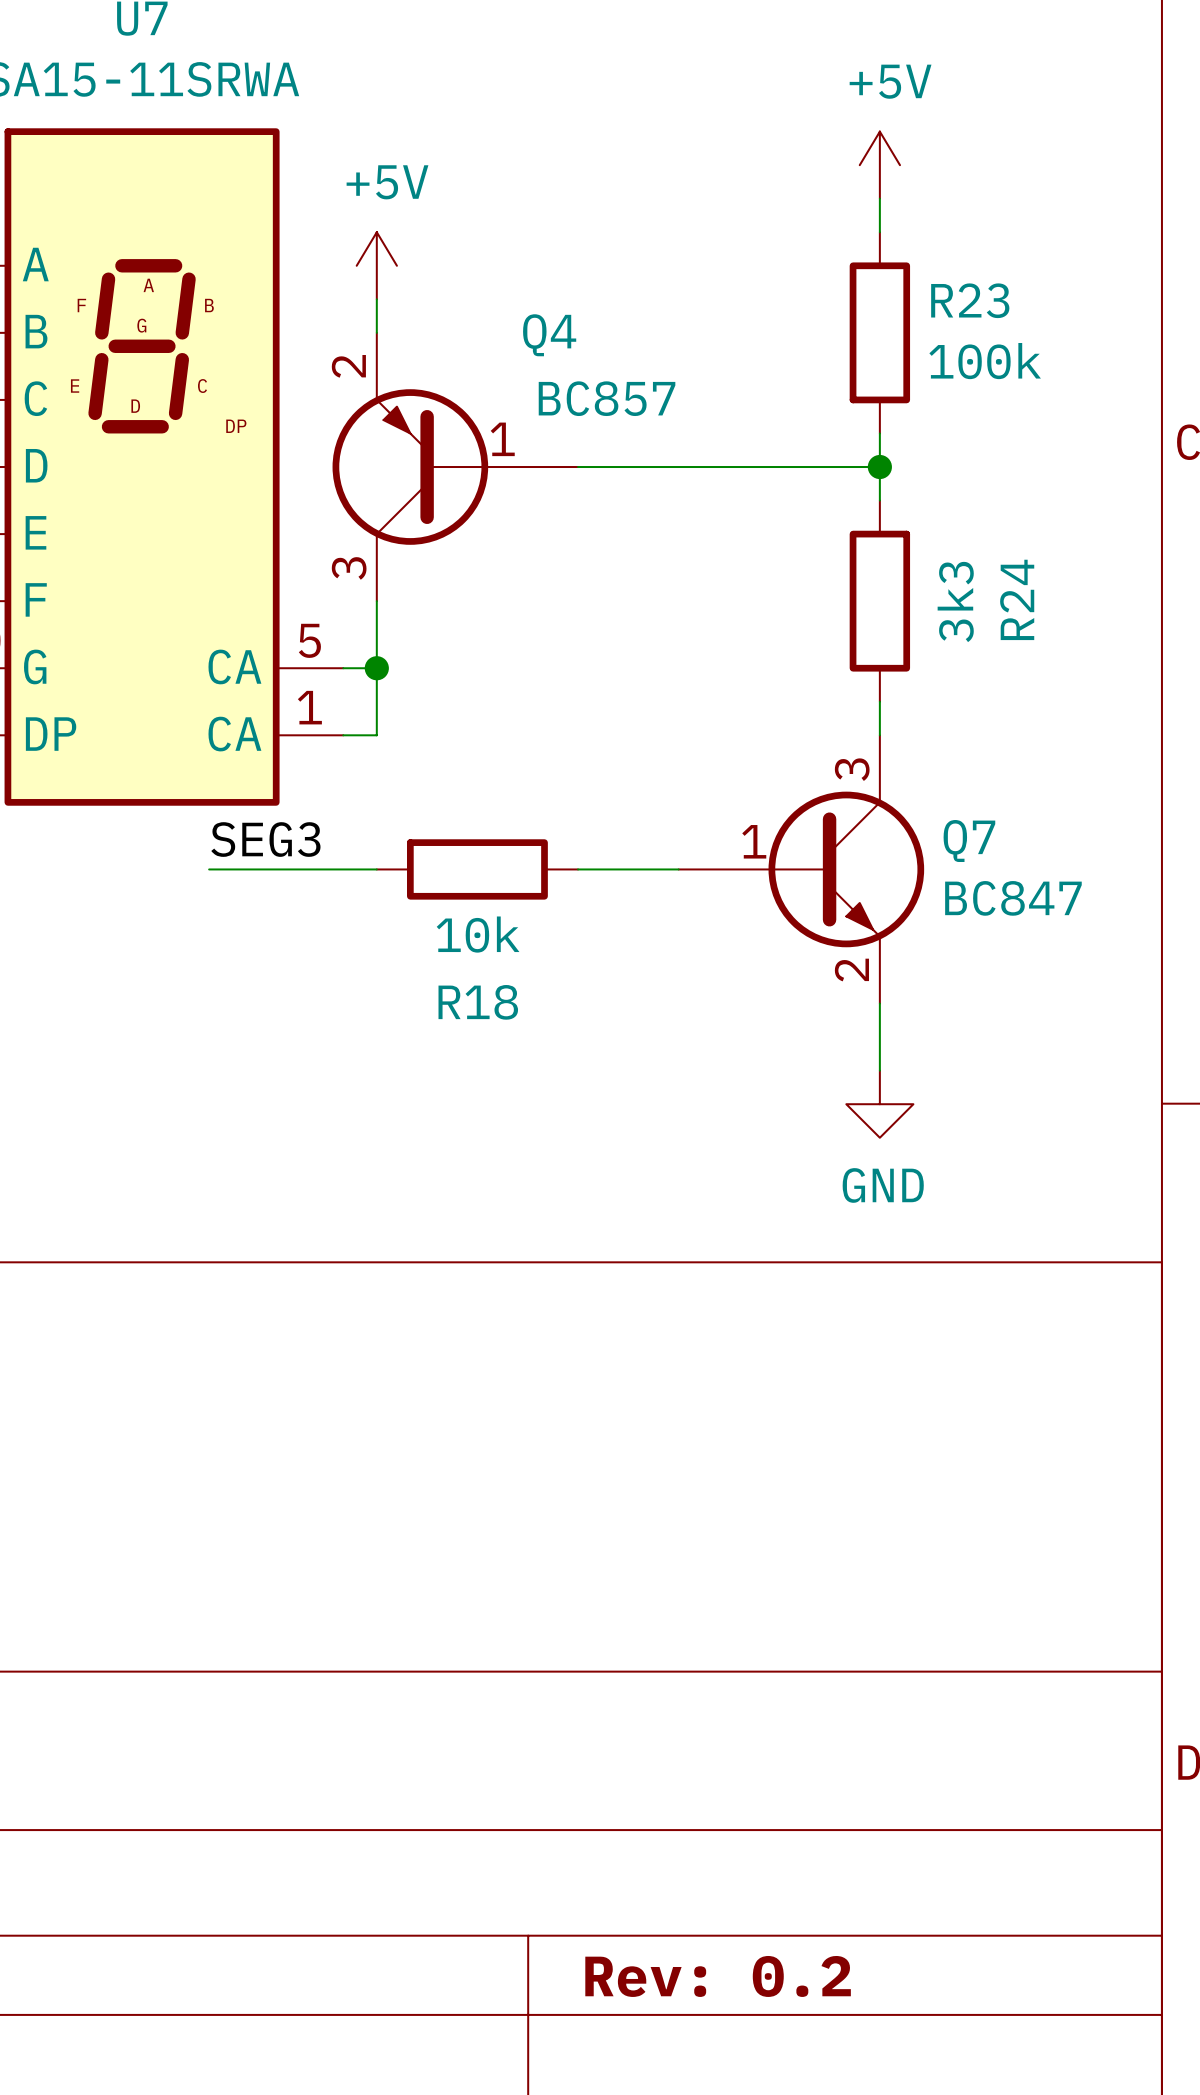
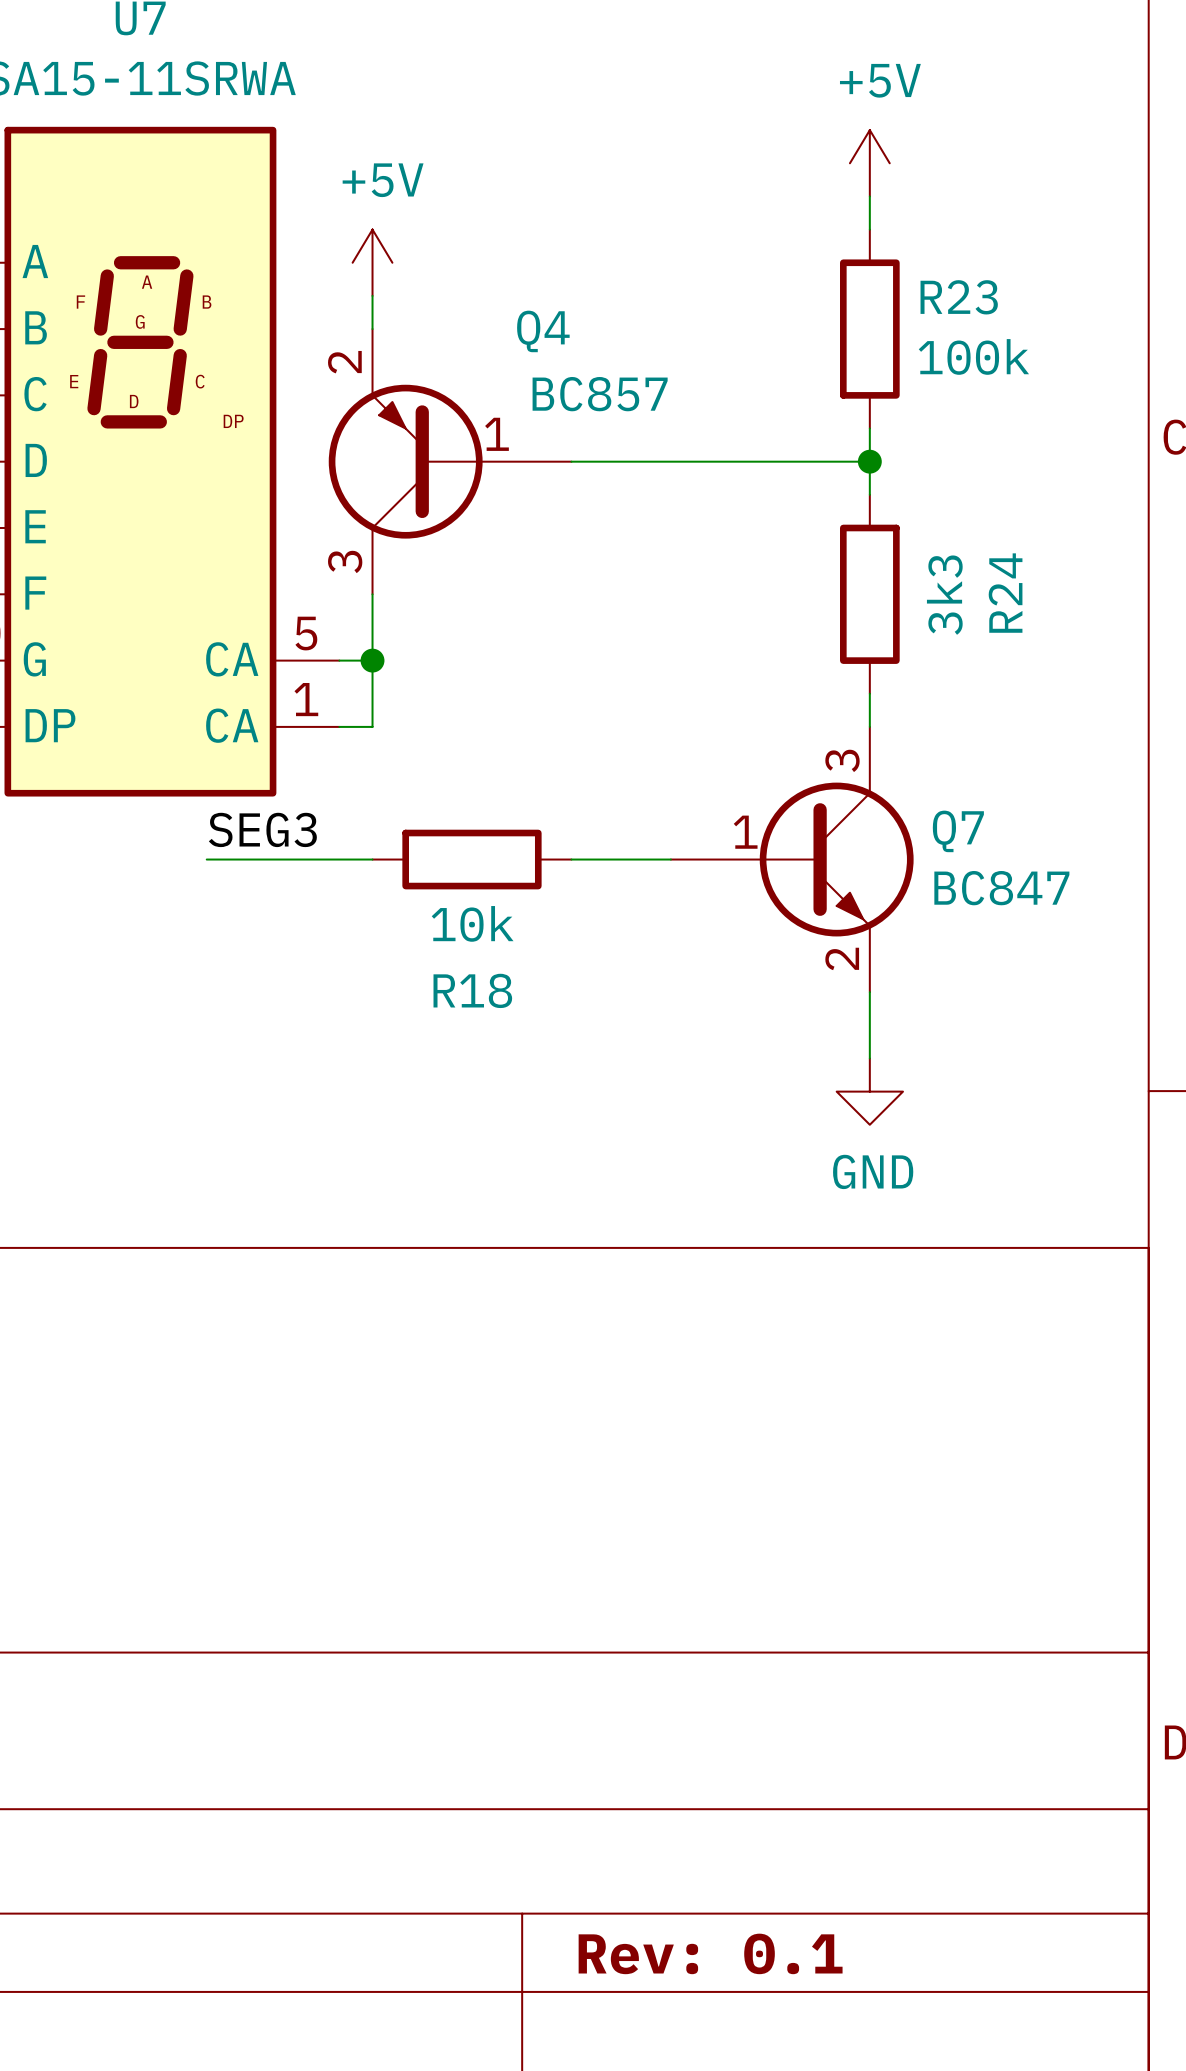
title block: Rev: 0.2 (718, 1976) -> Rev: 0.1 (710, 1953)

